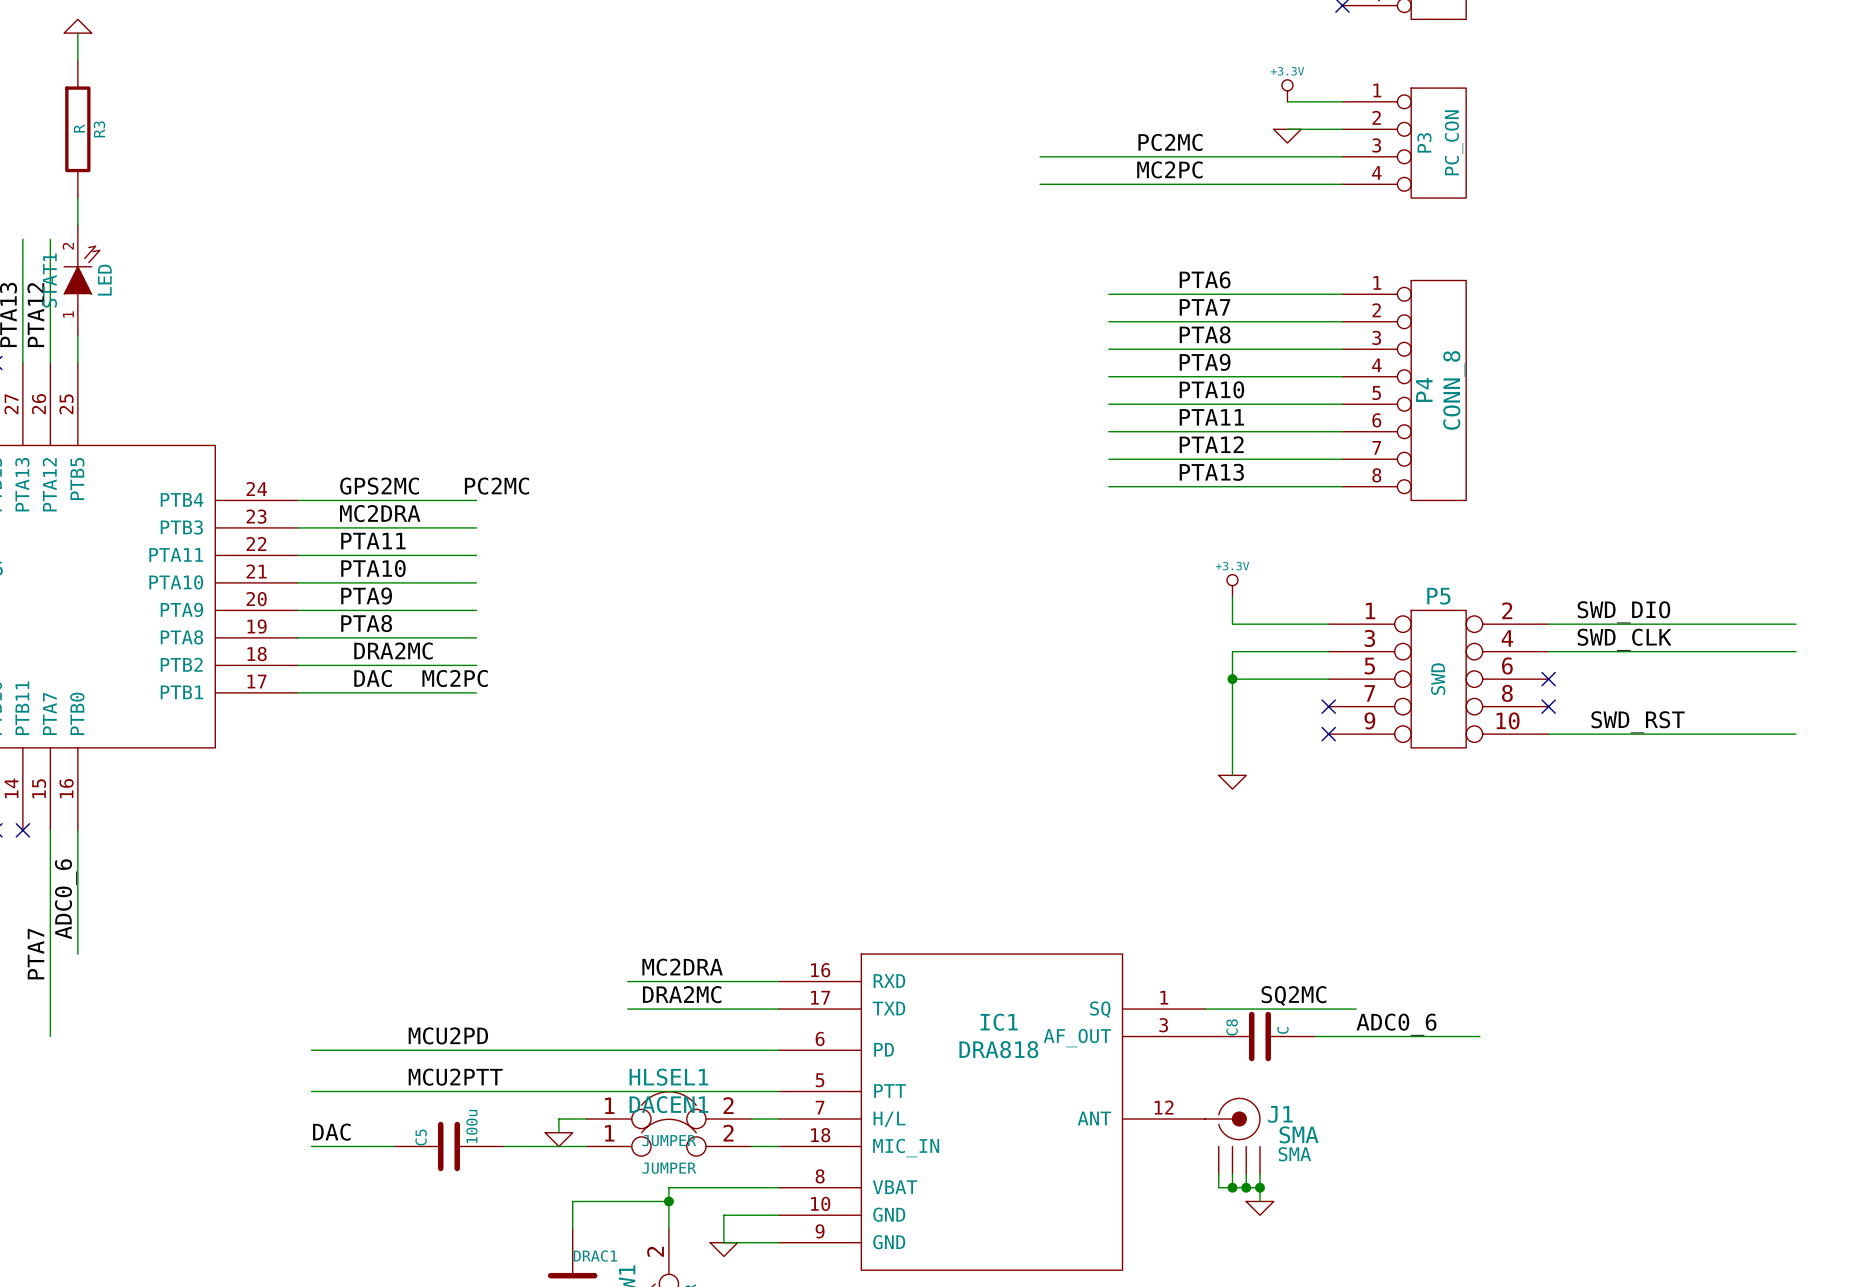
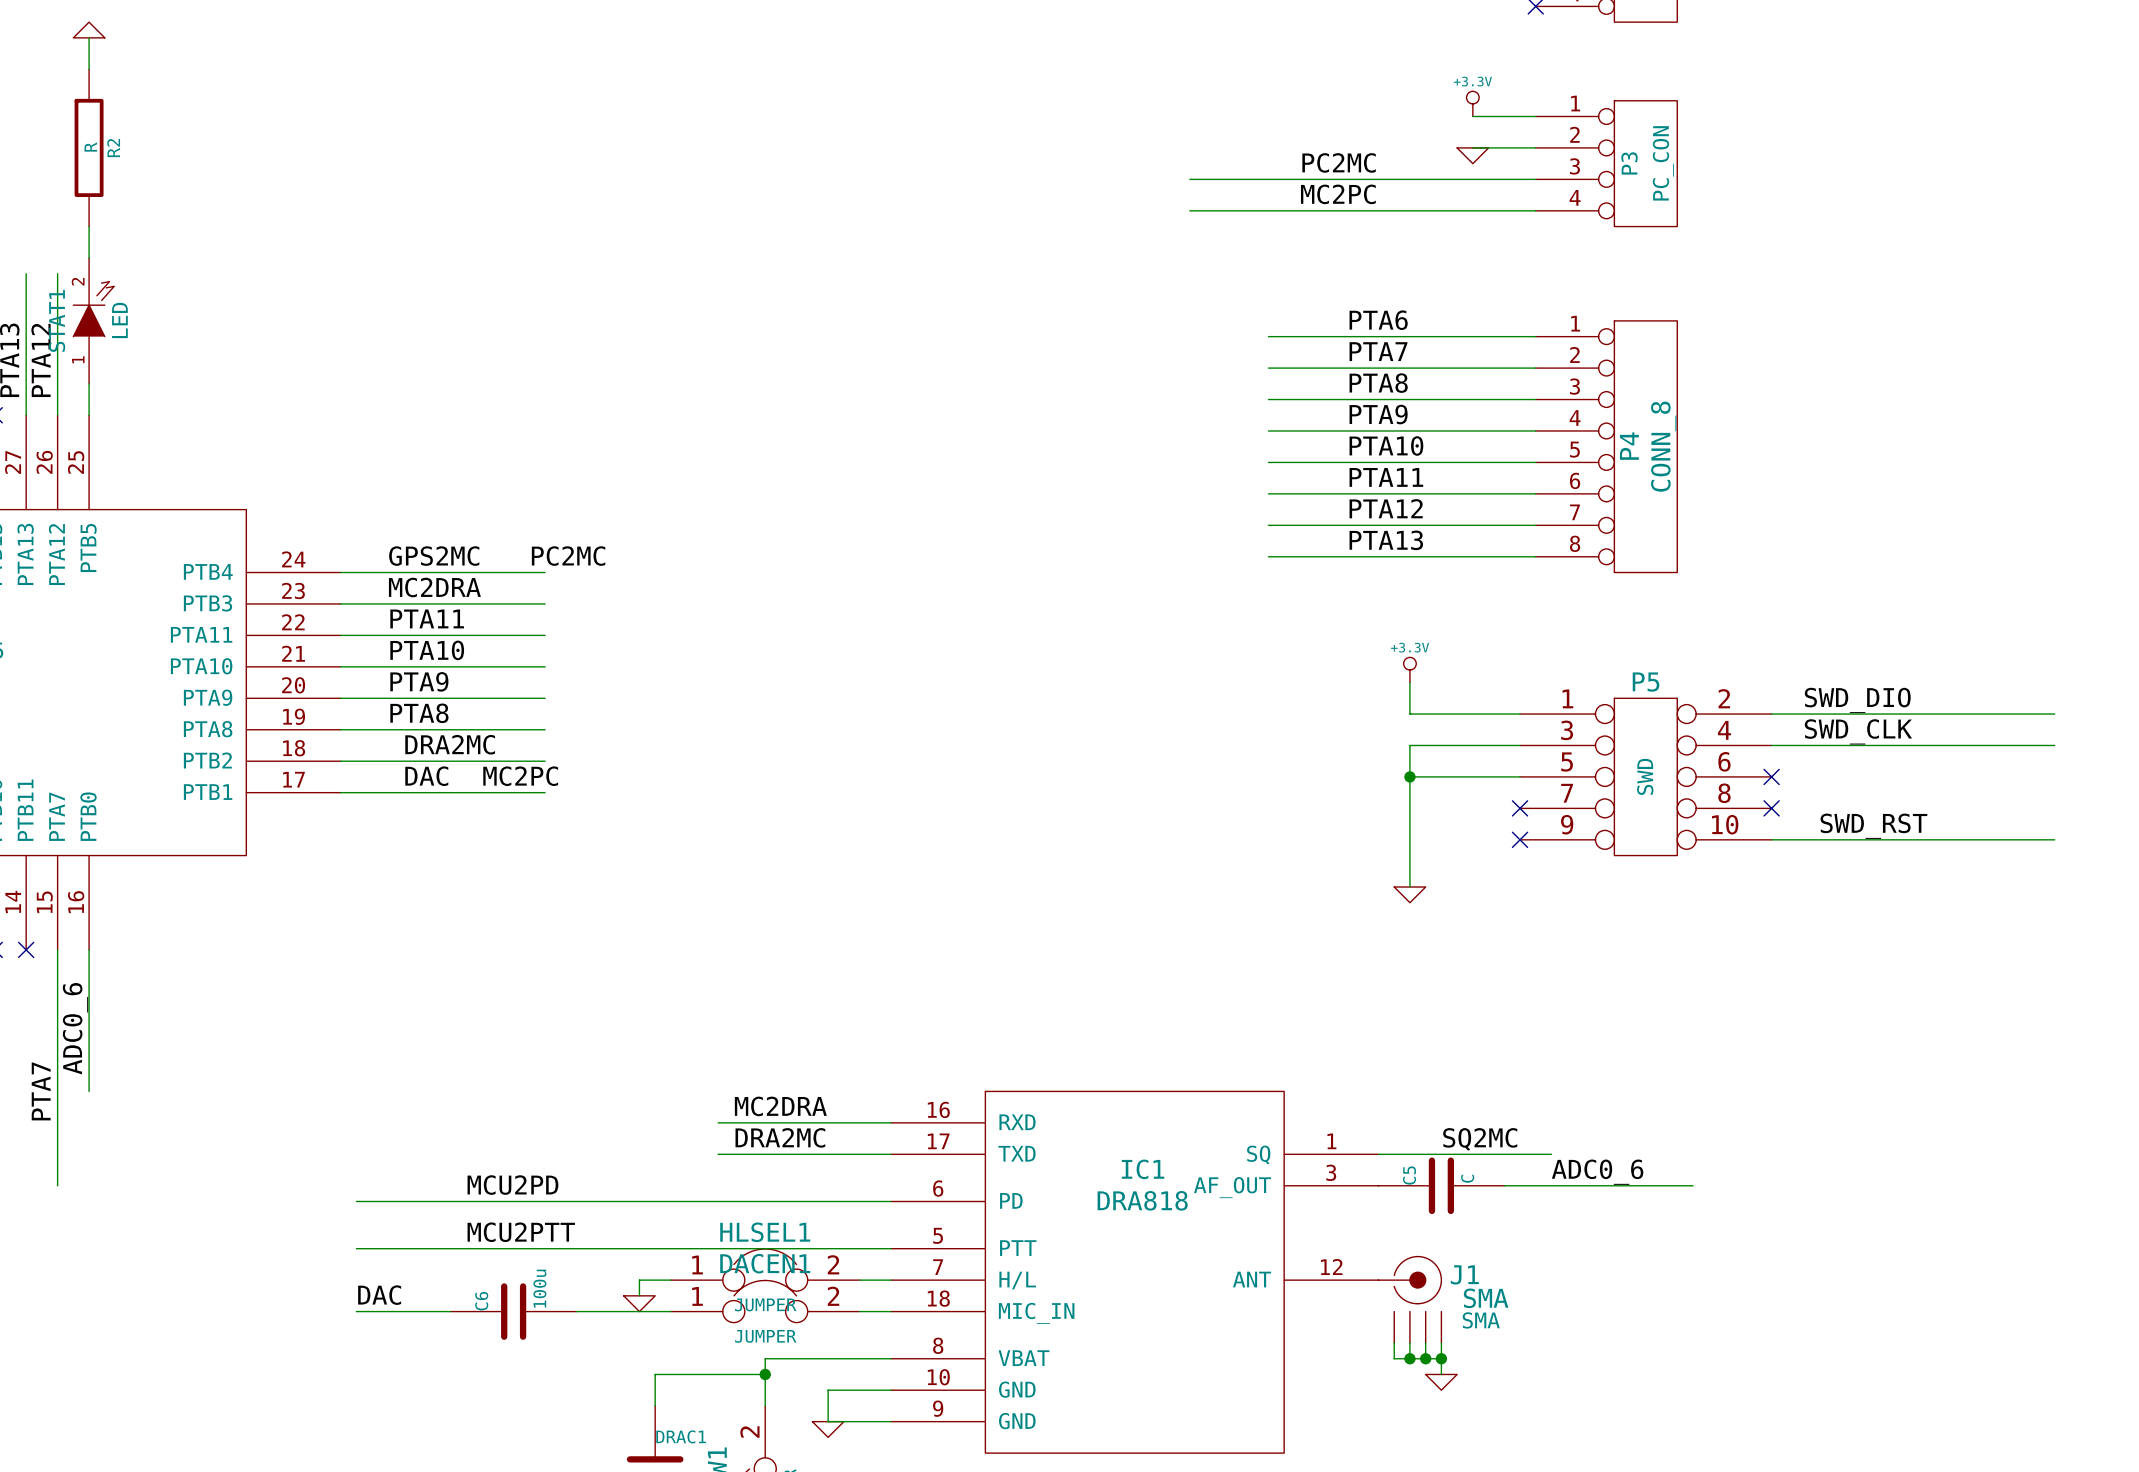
R3 name: R3 (99, 129) -> R2 (113, 148)
C8 name: C8 (1232, 1027) -> C5 (1409, 1175)
C5 name: C5 (421, 1137) -> C6 (481, 1301)

